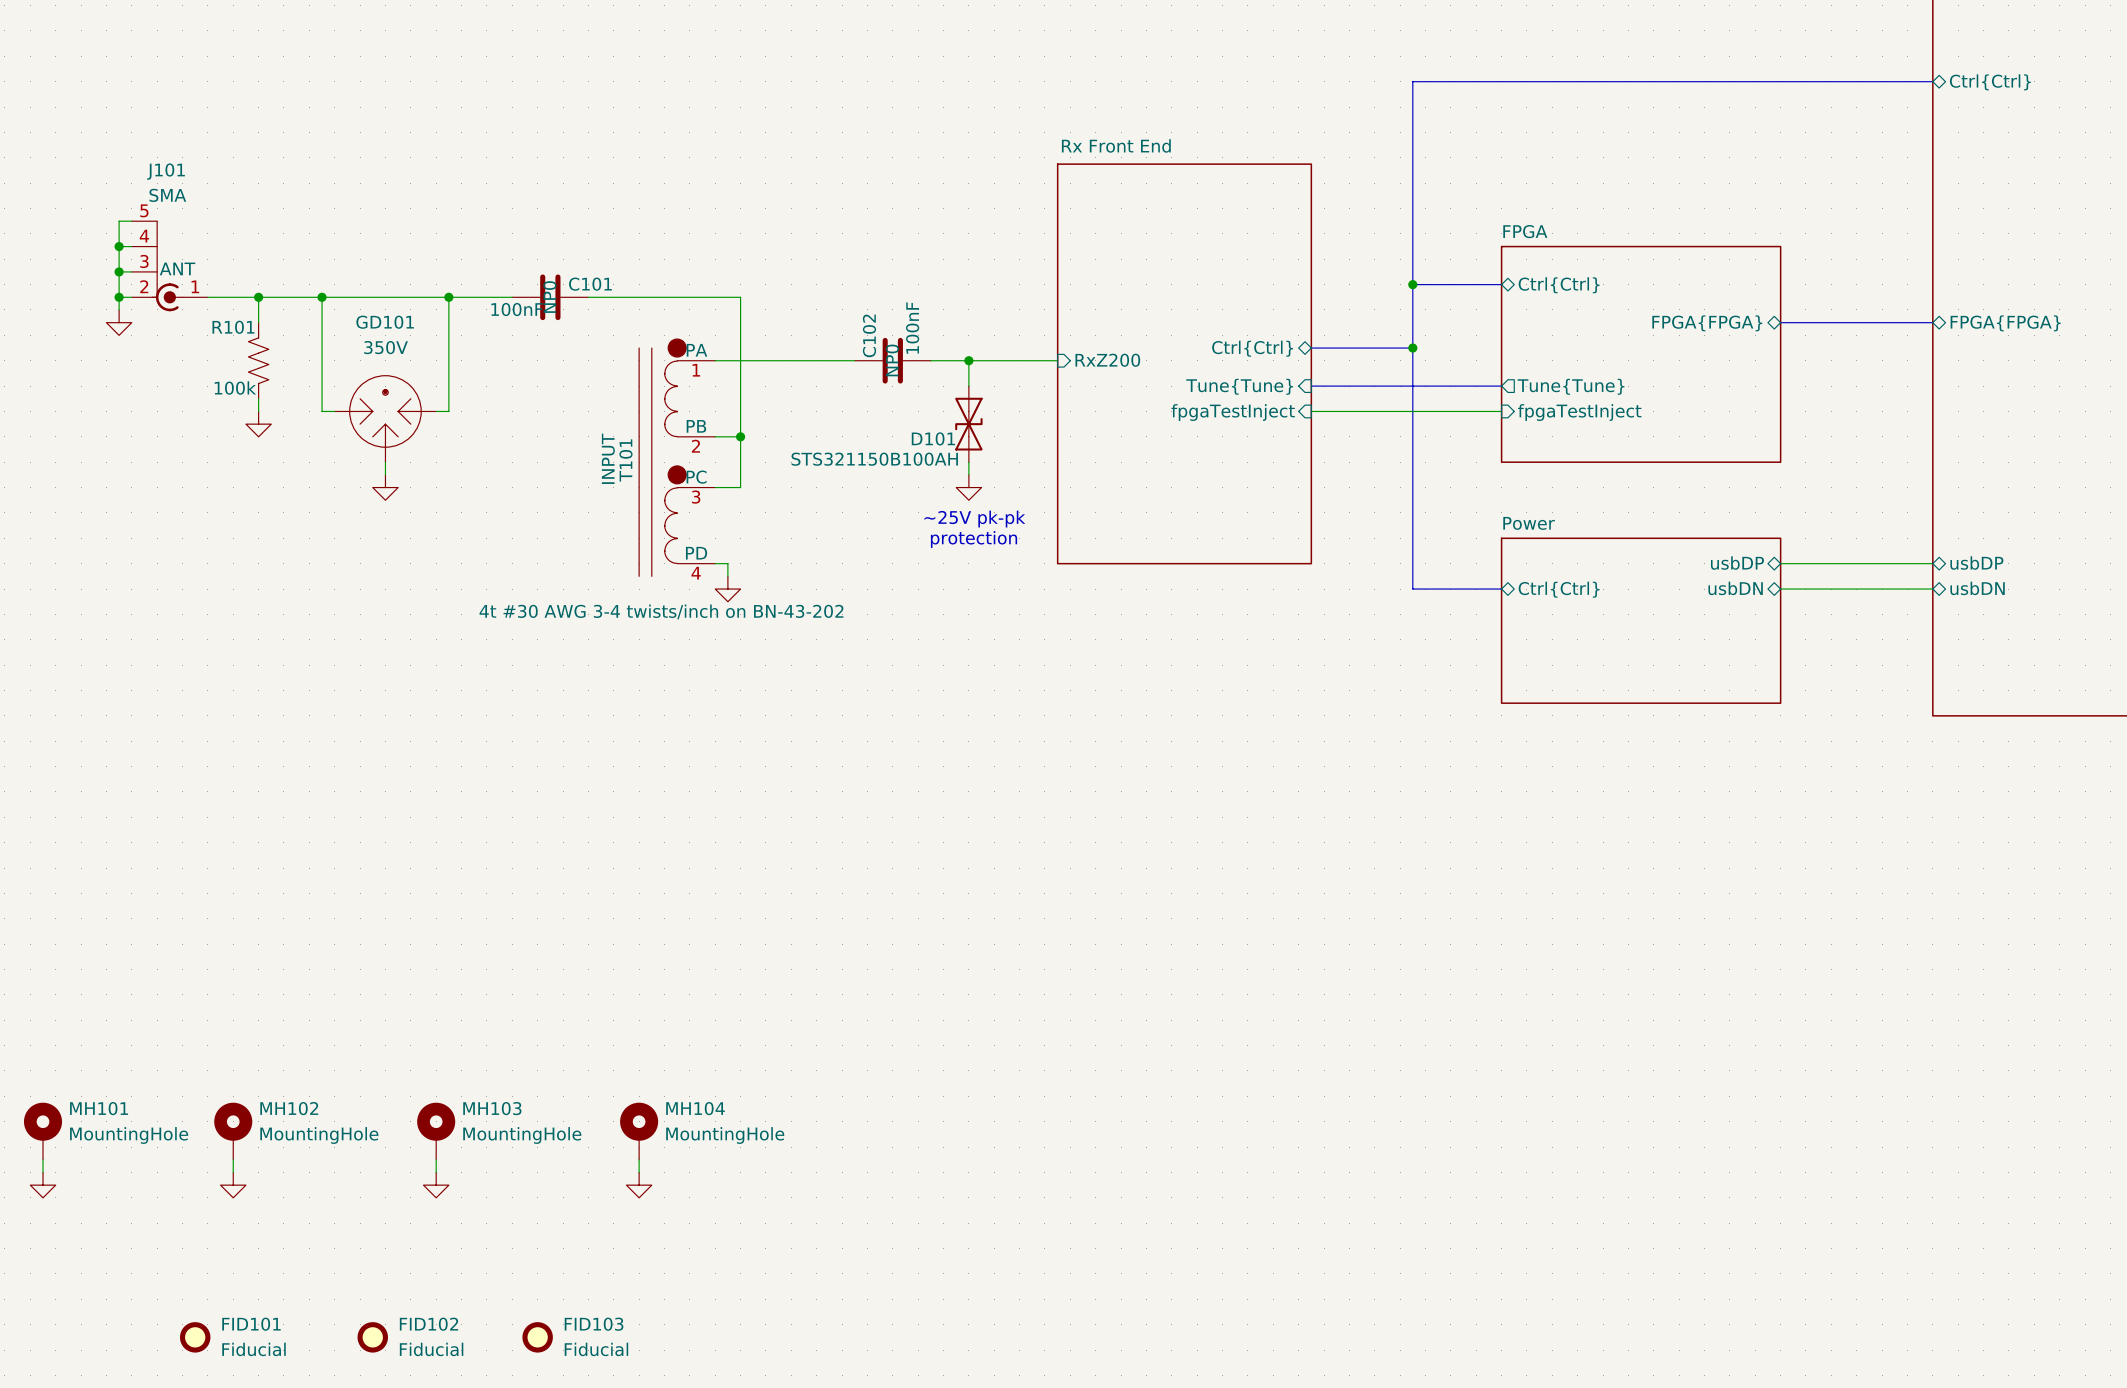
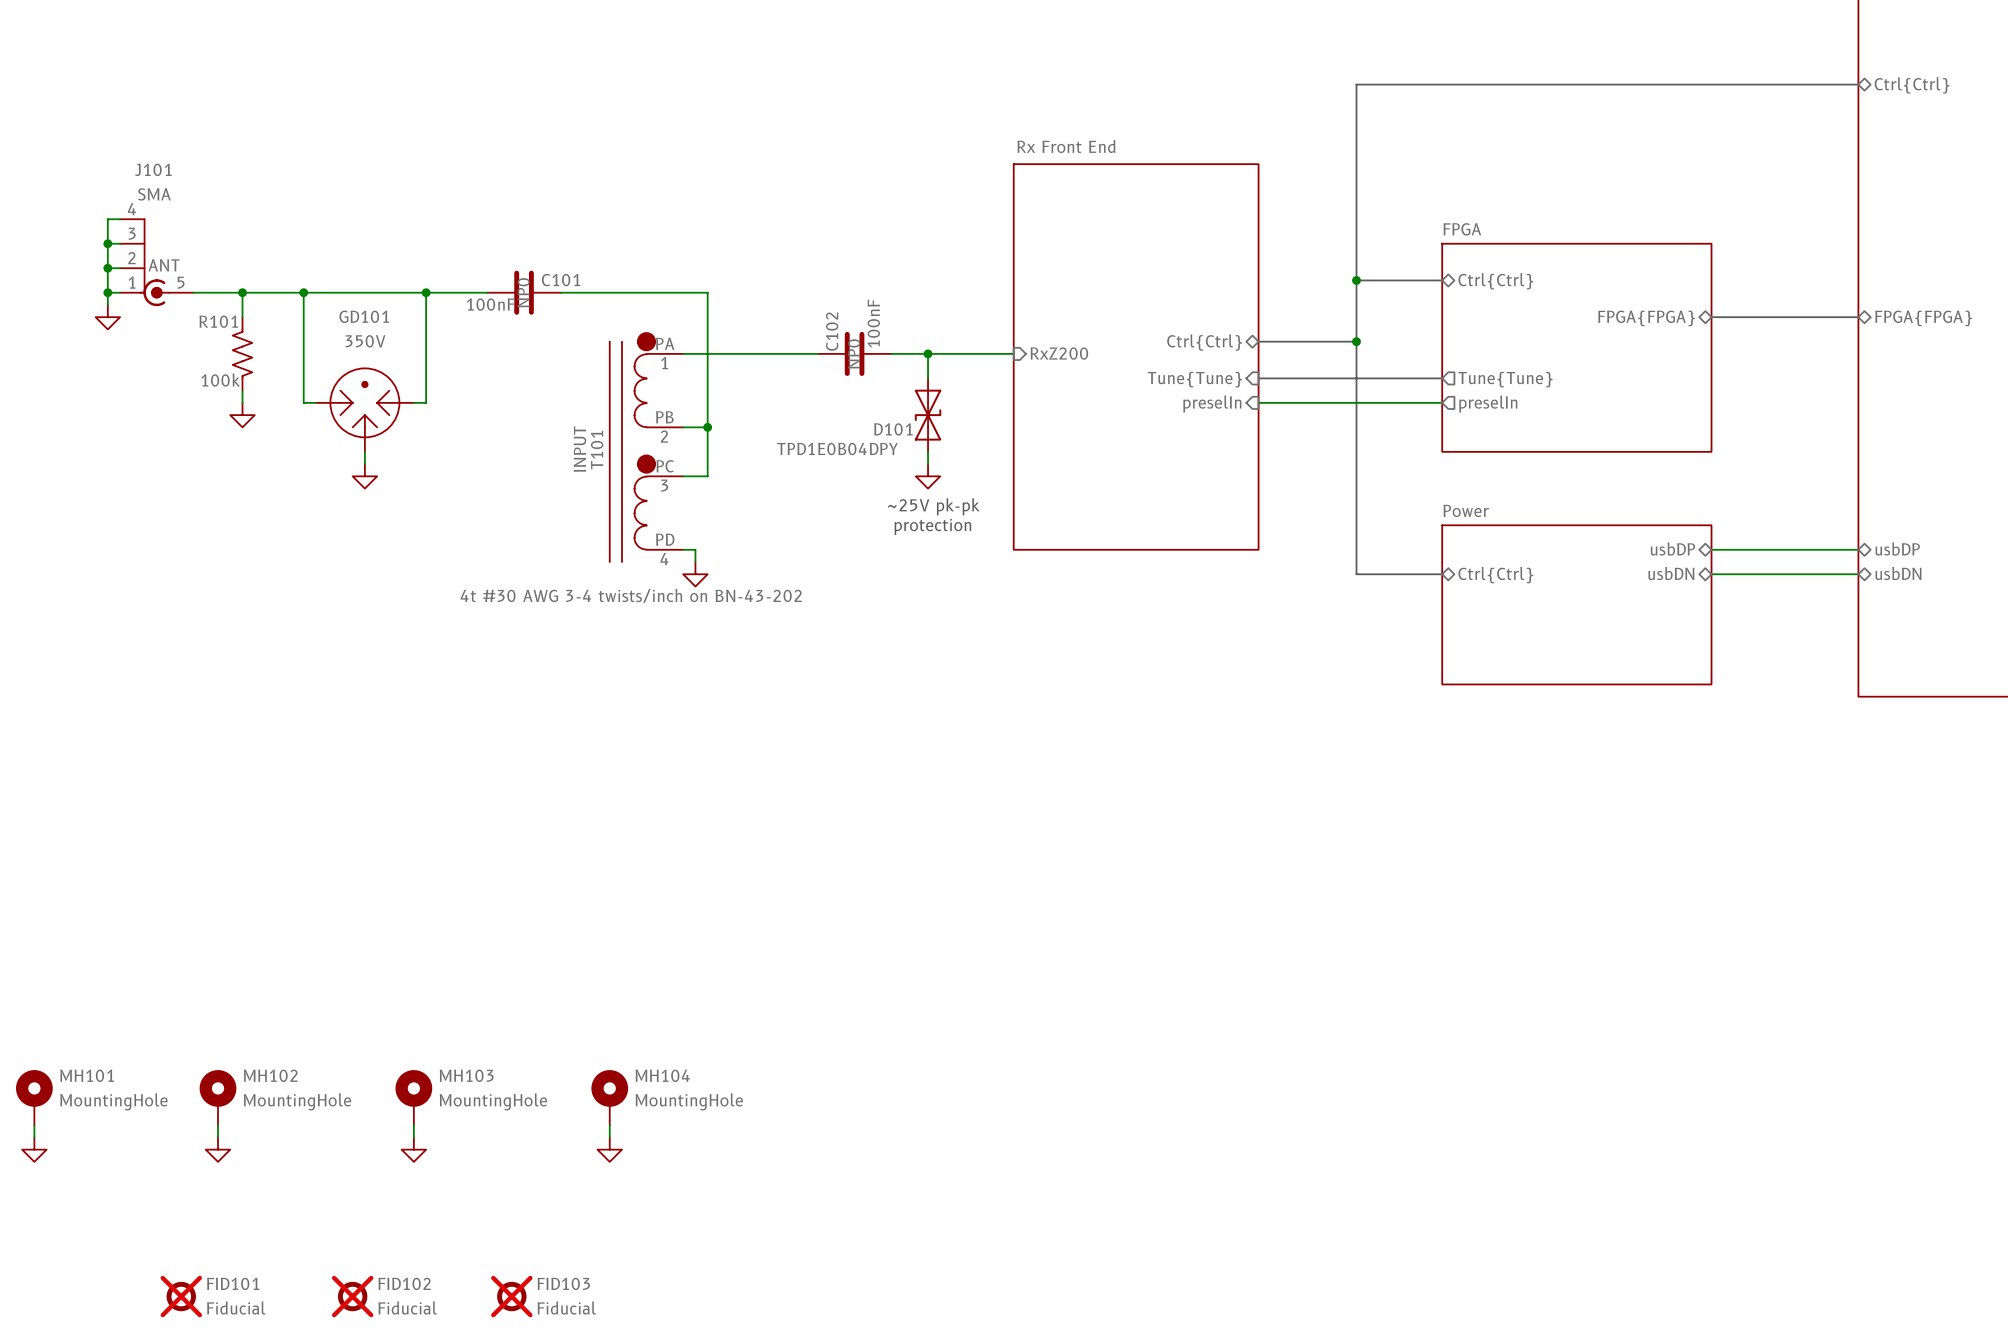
J101 pin number: 5 (144, 210) -> 4 (131, 209)
J101 pin number: 4 (144, 236) -> 3 (132, 233)
J101 pin number: 3 (144, 261) -> 2 (131, 258)
J101 pin number: 2 (144, 286) -> 1 (132, 282)
J101 pin number: 1 (195, 286) -> 5 (181, 282)
sheet pin: fpgaTestInject (1233, 412) -> preselIn (1212, 404)
sheet pin shape: input (1579, 412) -> output (1488, 404)
sheet pin: fpgaTestInject (1579, 412) -> preselIn (1488, 404)
D101 value: STS321150B100AH (874, 459) -> TPD1E0B04DPY (837, 449)
FID101 do-not-place cross: none -> (181, 1296)
FID102 do-not-place cross: none -> (352, 1296)
FID103 do-not-place cross: none -> (511, 1296)

